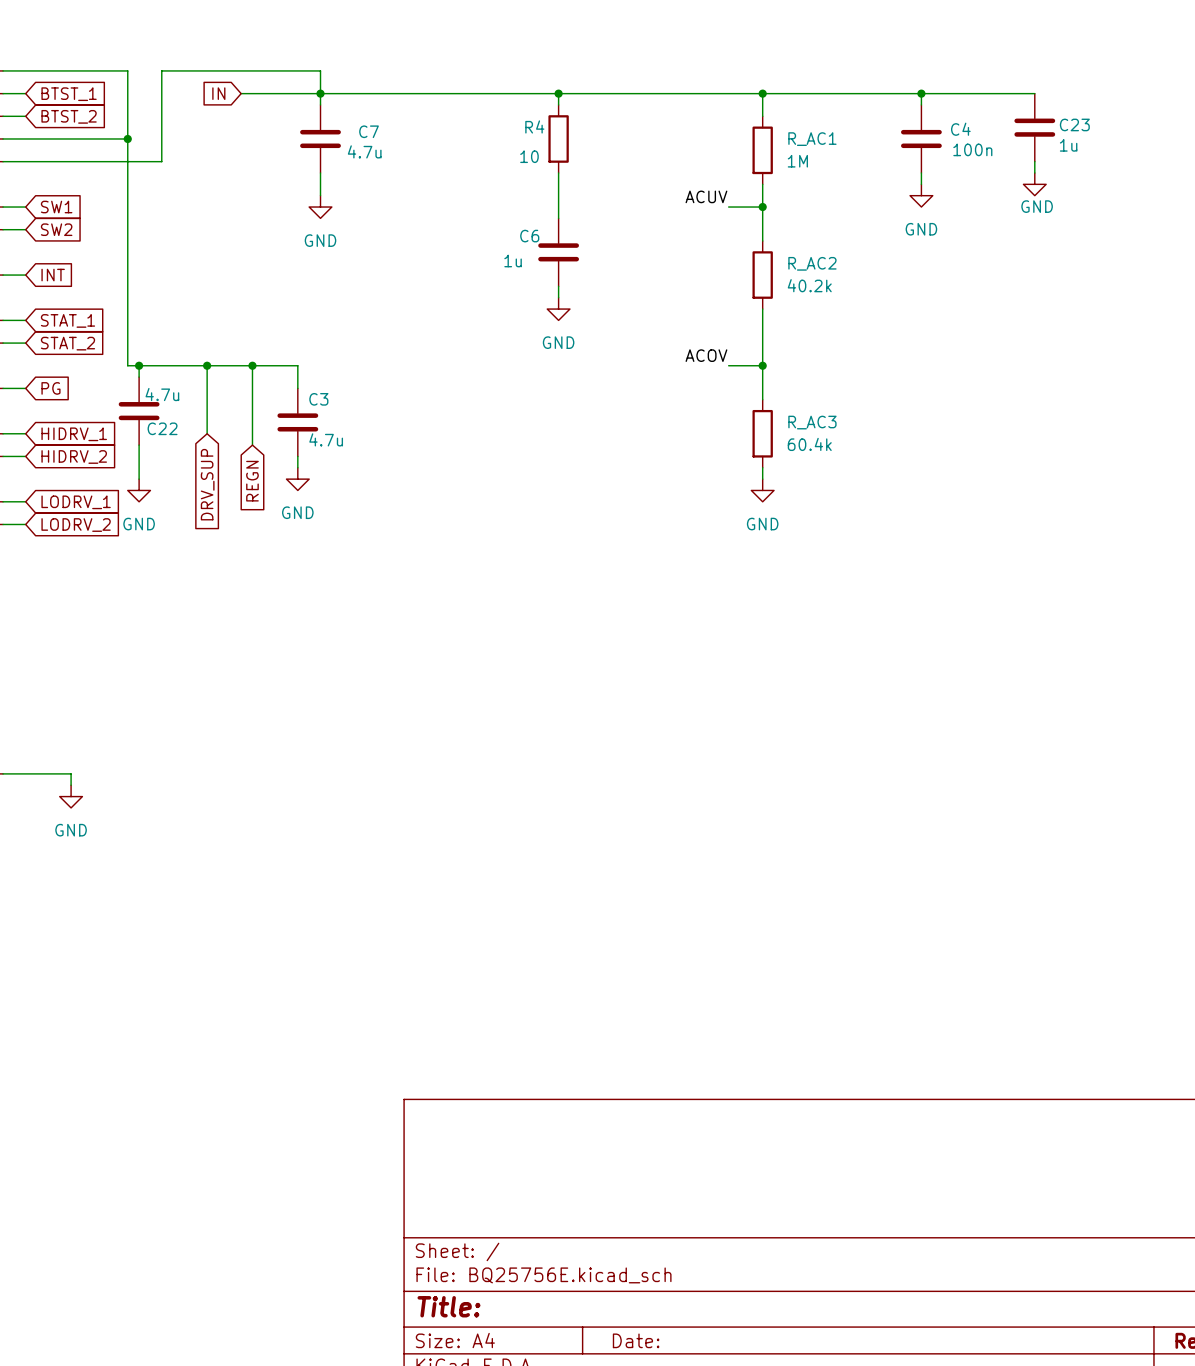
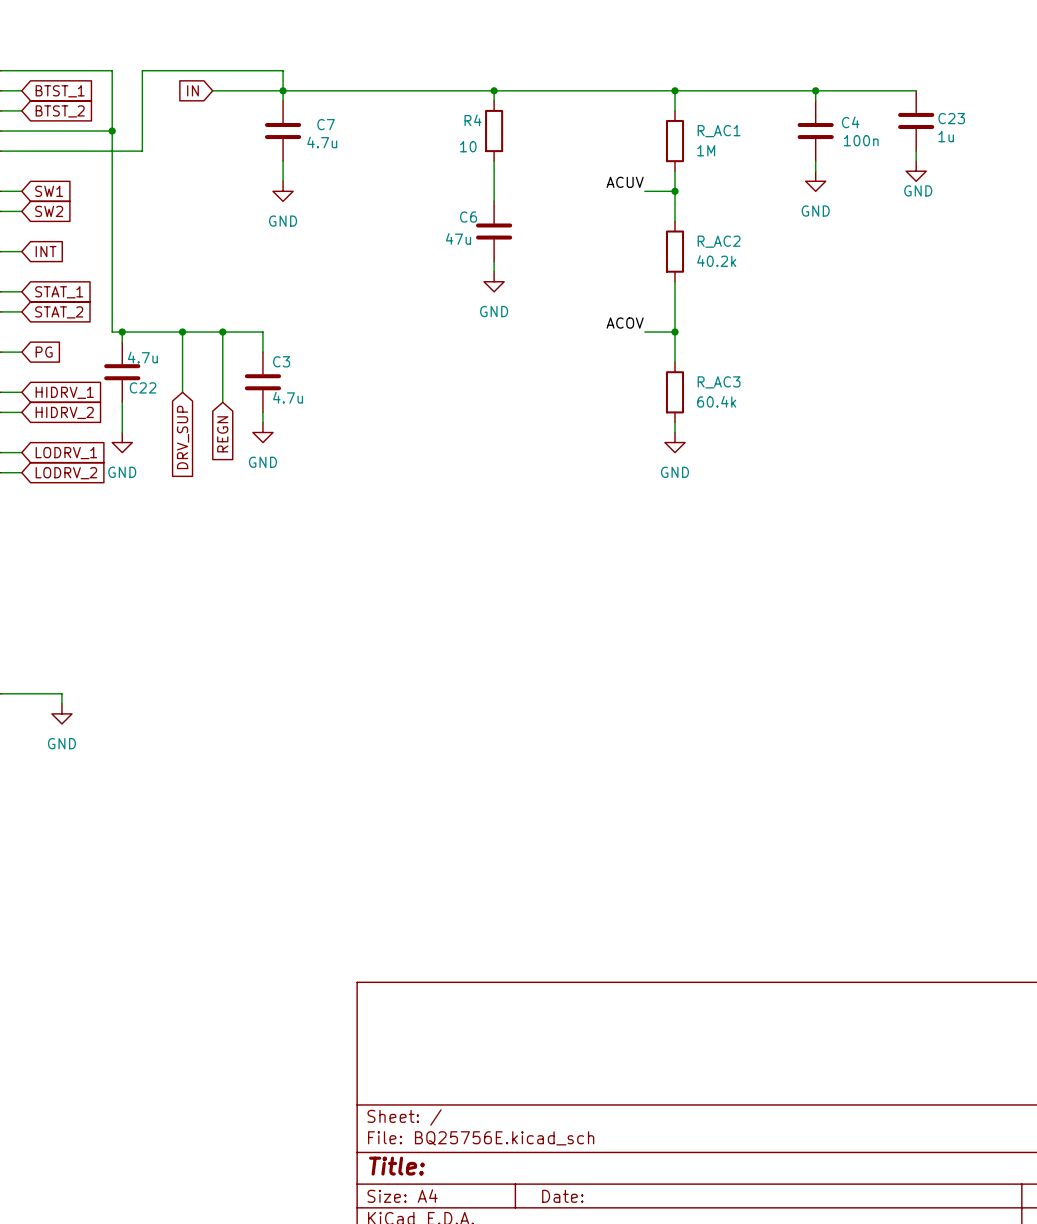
C6 value: 1u (513, 261) -> 47u (458, 238)

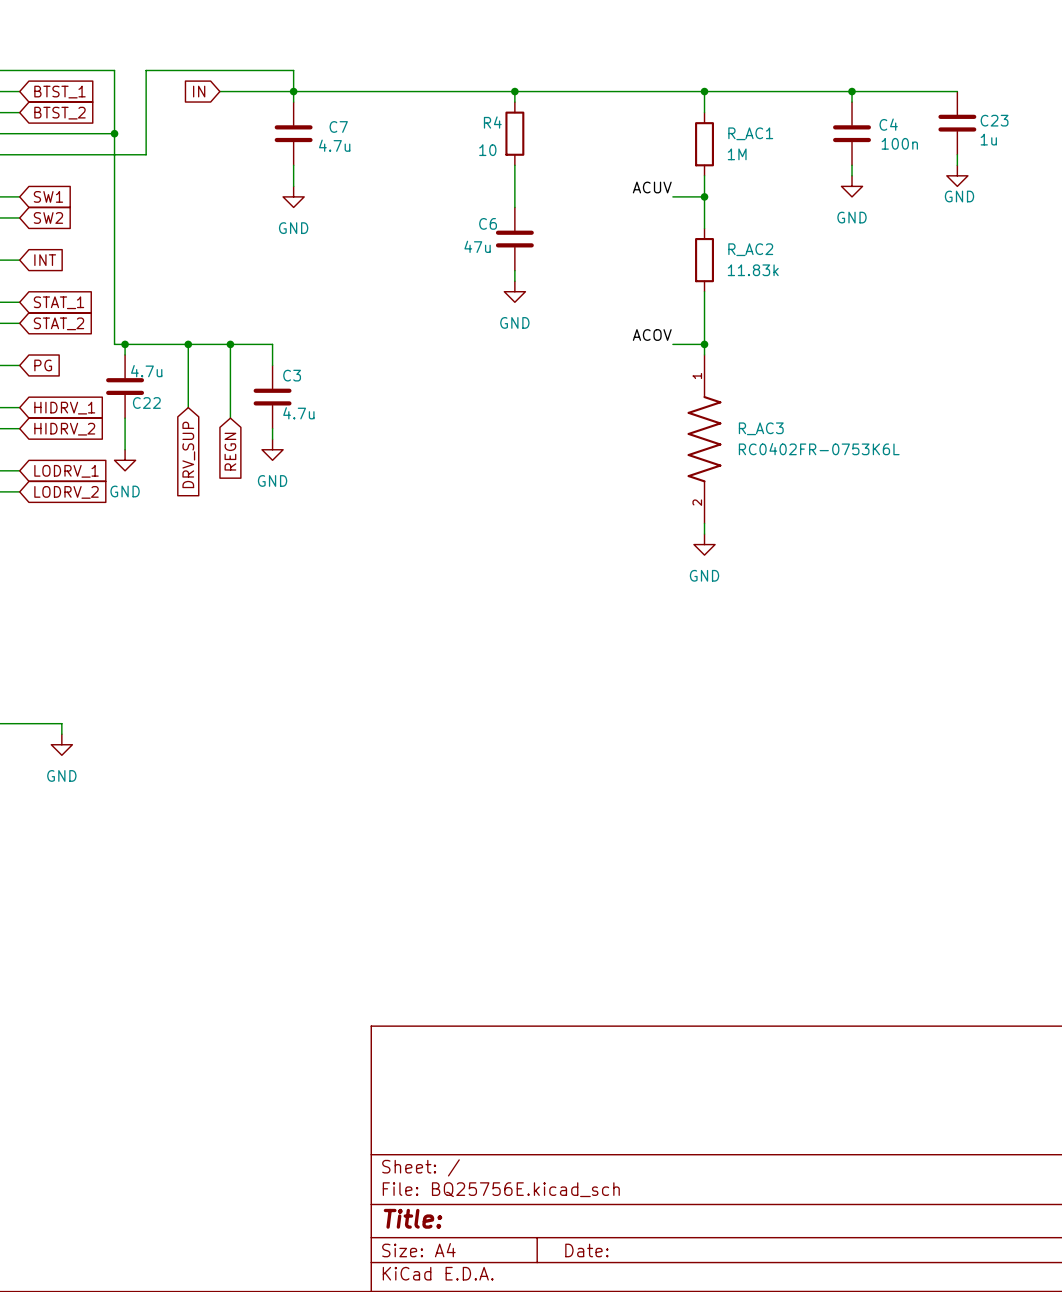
R_AC2 value: 40.2k (716, 261) -> 11.83k (753, 270)
R_AC3 symbol: [665, 362, 685, 423] -> [687, 354, 722, 524]
R_AC3 value: 60.4k (716, 401) -> RC0402FR-0753K6L (819, 449)
wire: (675, 422) (675, 432) -> (704, 523) (704, 534)
power symbol position: GND (675, 442) -> GND (704, 544)

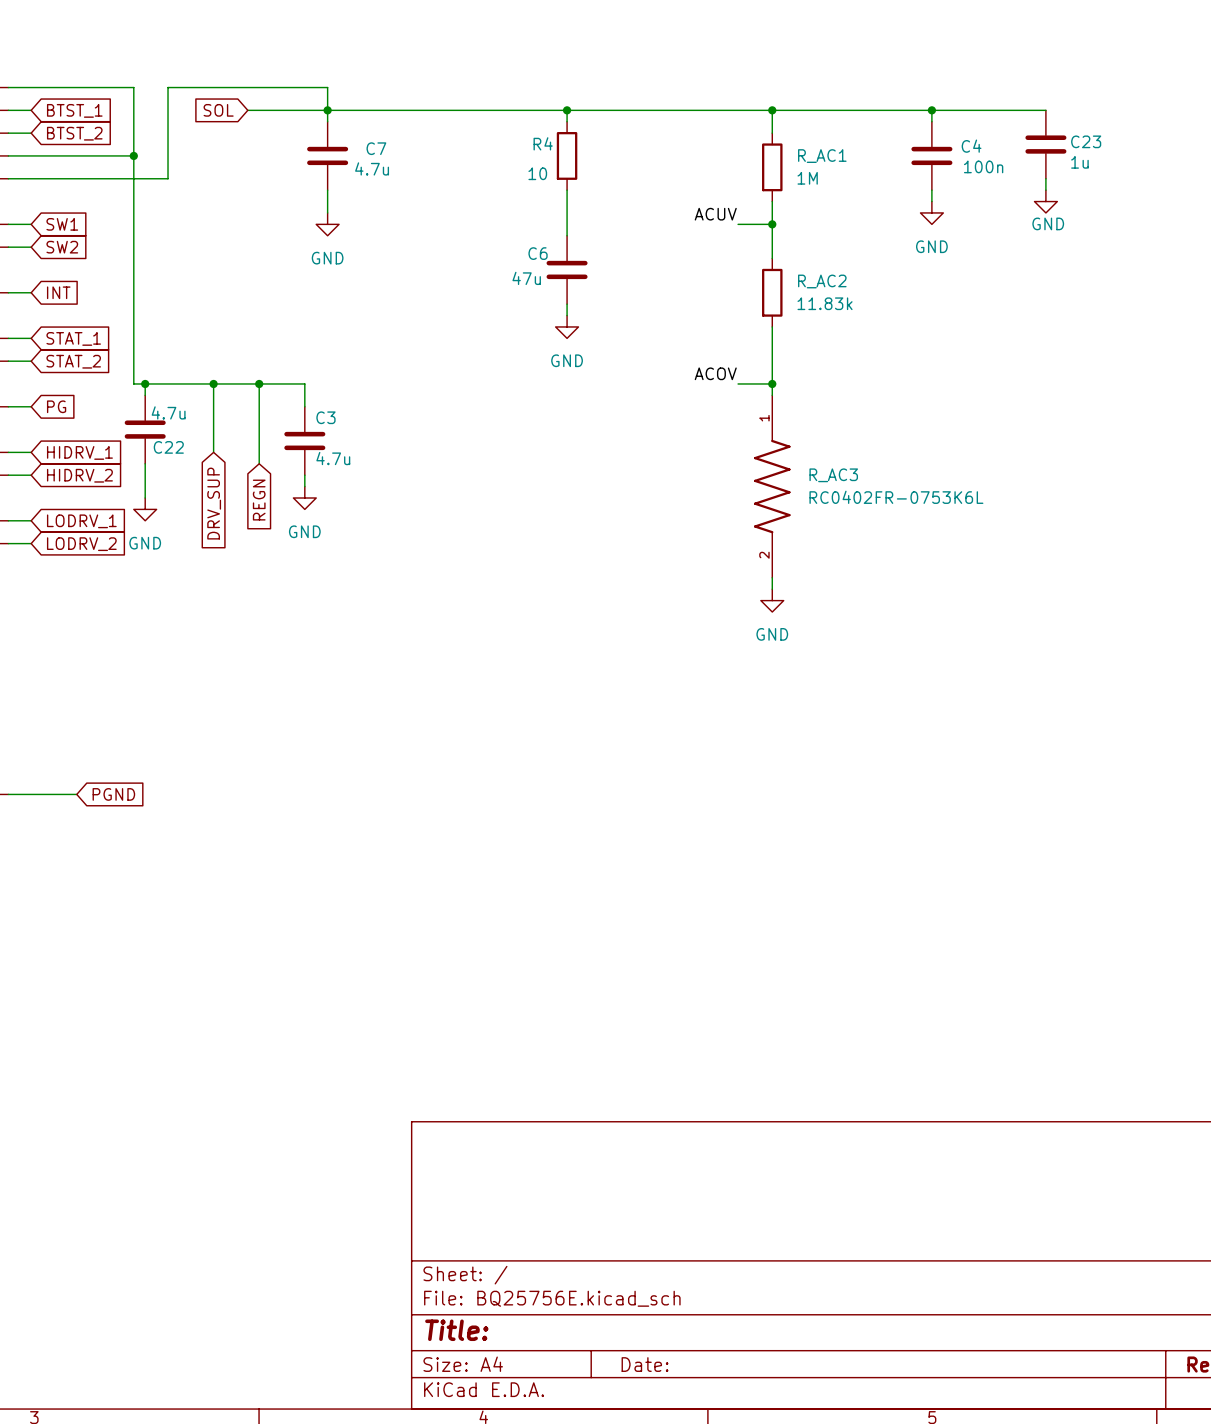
global label: IN (199, 91) -> SOL (218, 110)
wire: (61, 723) (61, 734) -> none
global label: none -> PGND (113, 794)
power symbol: GND (61, 744) -> none

